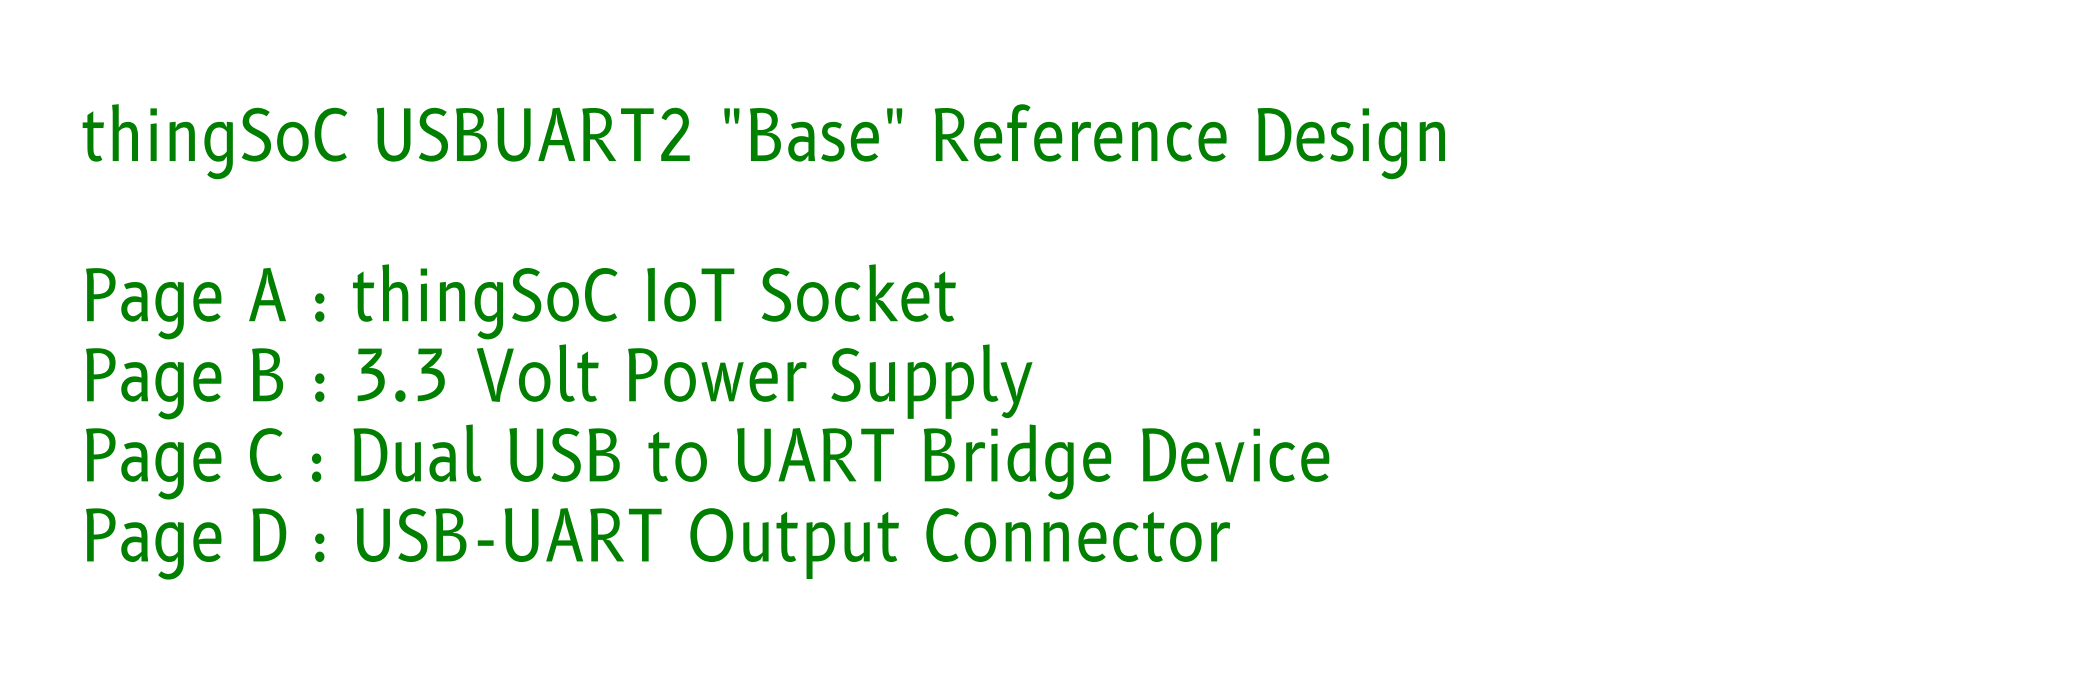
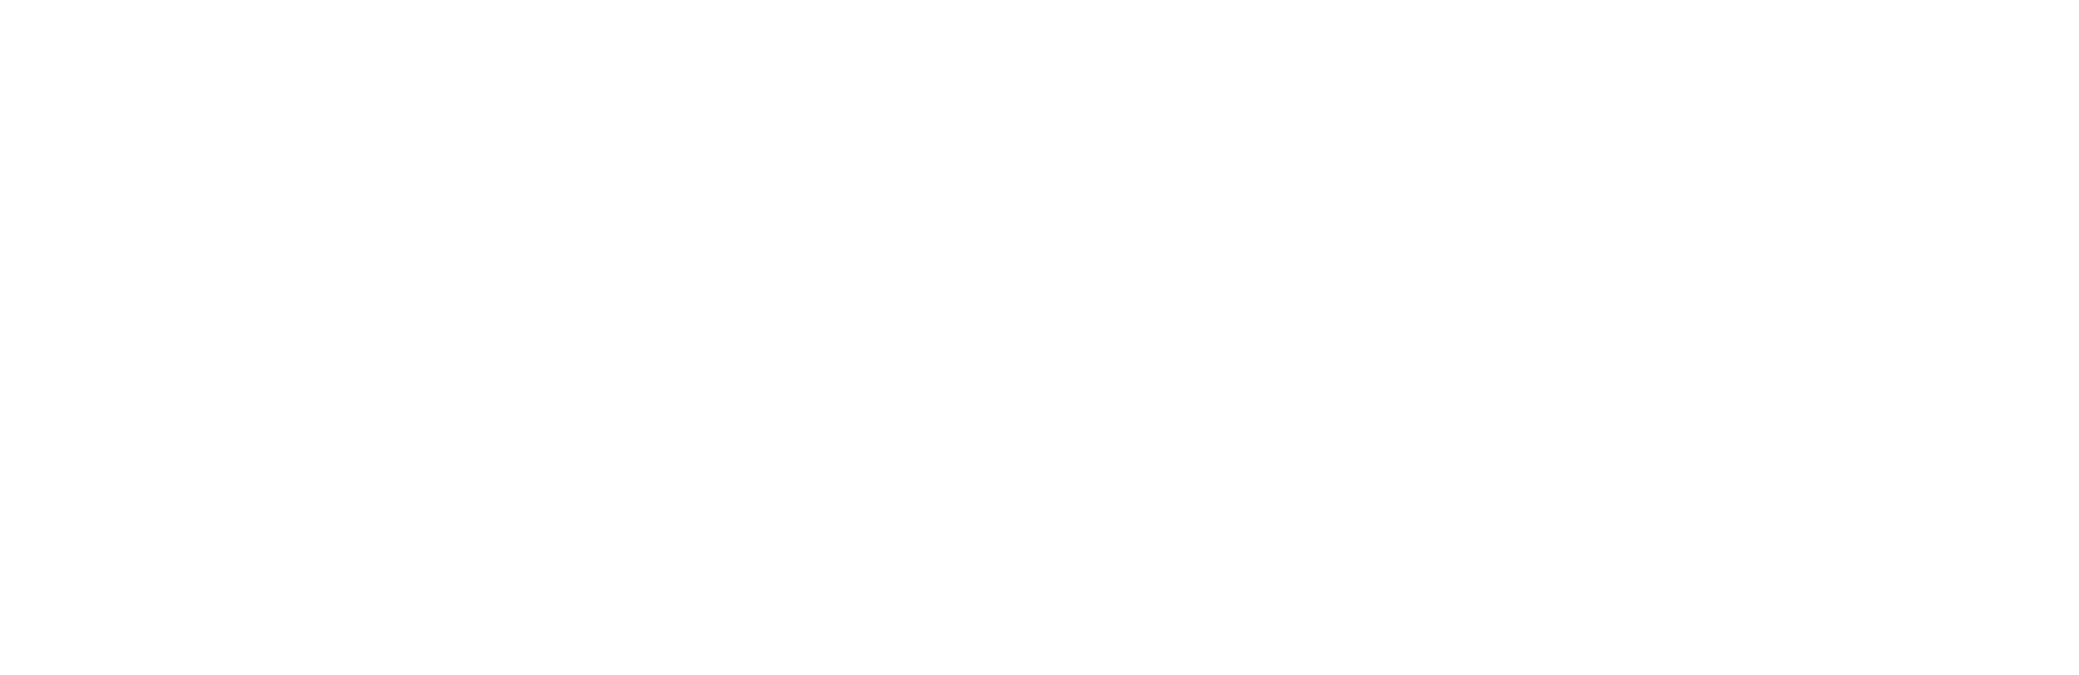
text: thingSoC USBUART2 "Base" Reference Design (763, 141) -> none
text: Page A : thingSoC IoT Socket (520, 301) -> none
text: Page B : 3.3 Volt Power Supply (559, 381) -> none
text: Page C : Dual USB to UART Bridge Device (707, 462) -> none
text: Page D : USB-UART Output Connector (658, 543) -> none

